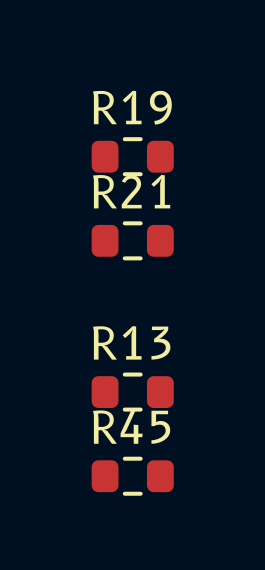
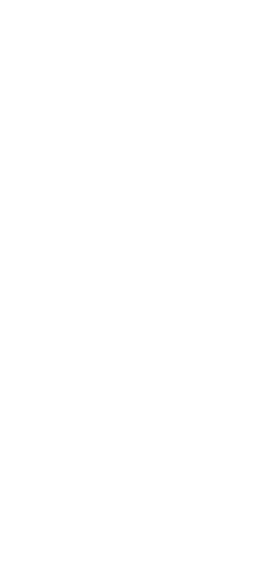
R19: (132, 156) -> none
R21: (132, 240) -> none
R13: (132, 392) -> none
R45: (132, 476) -> none

